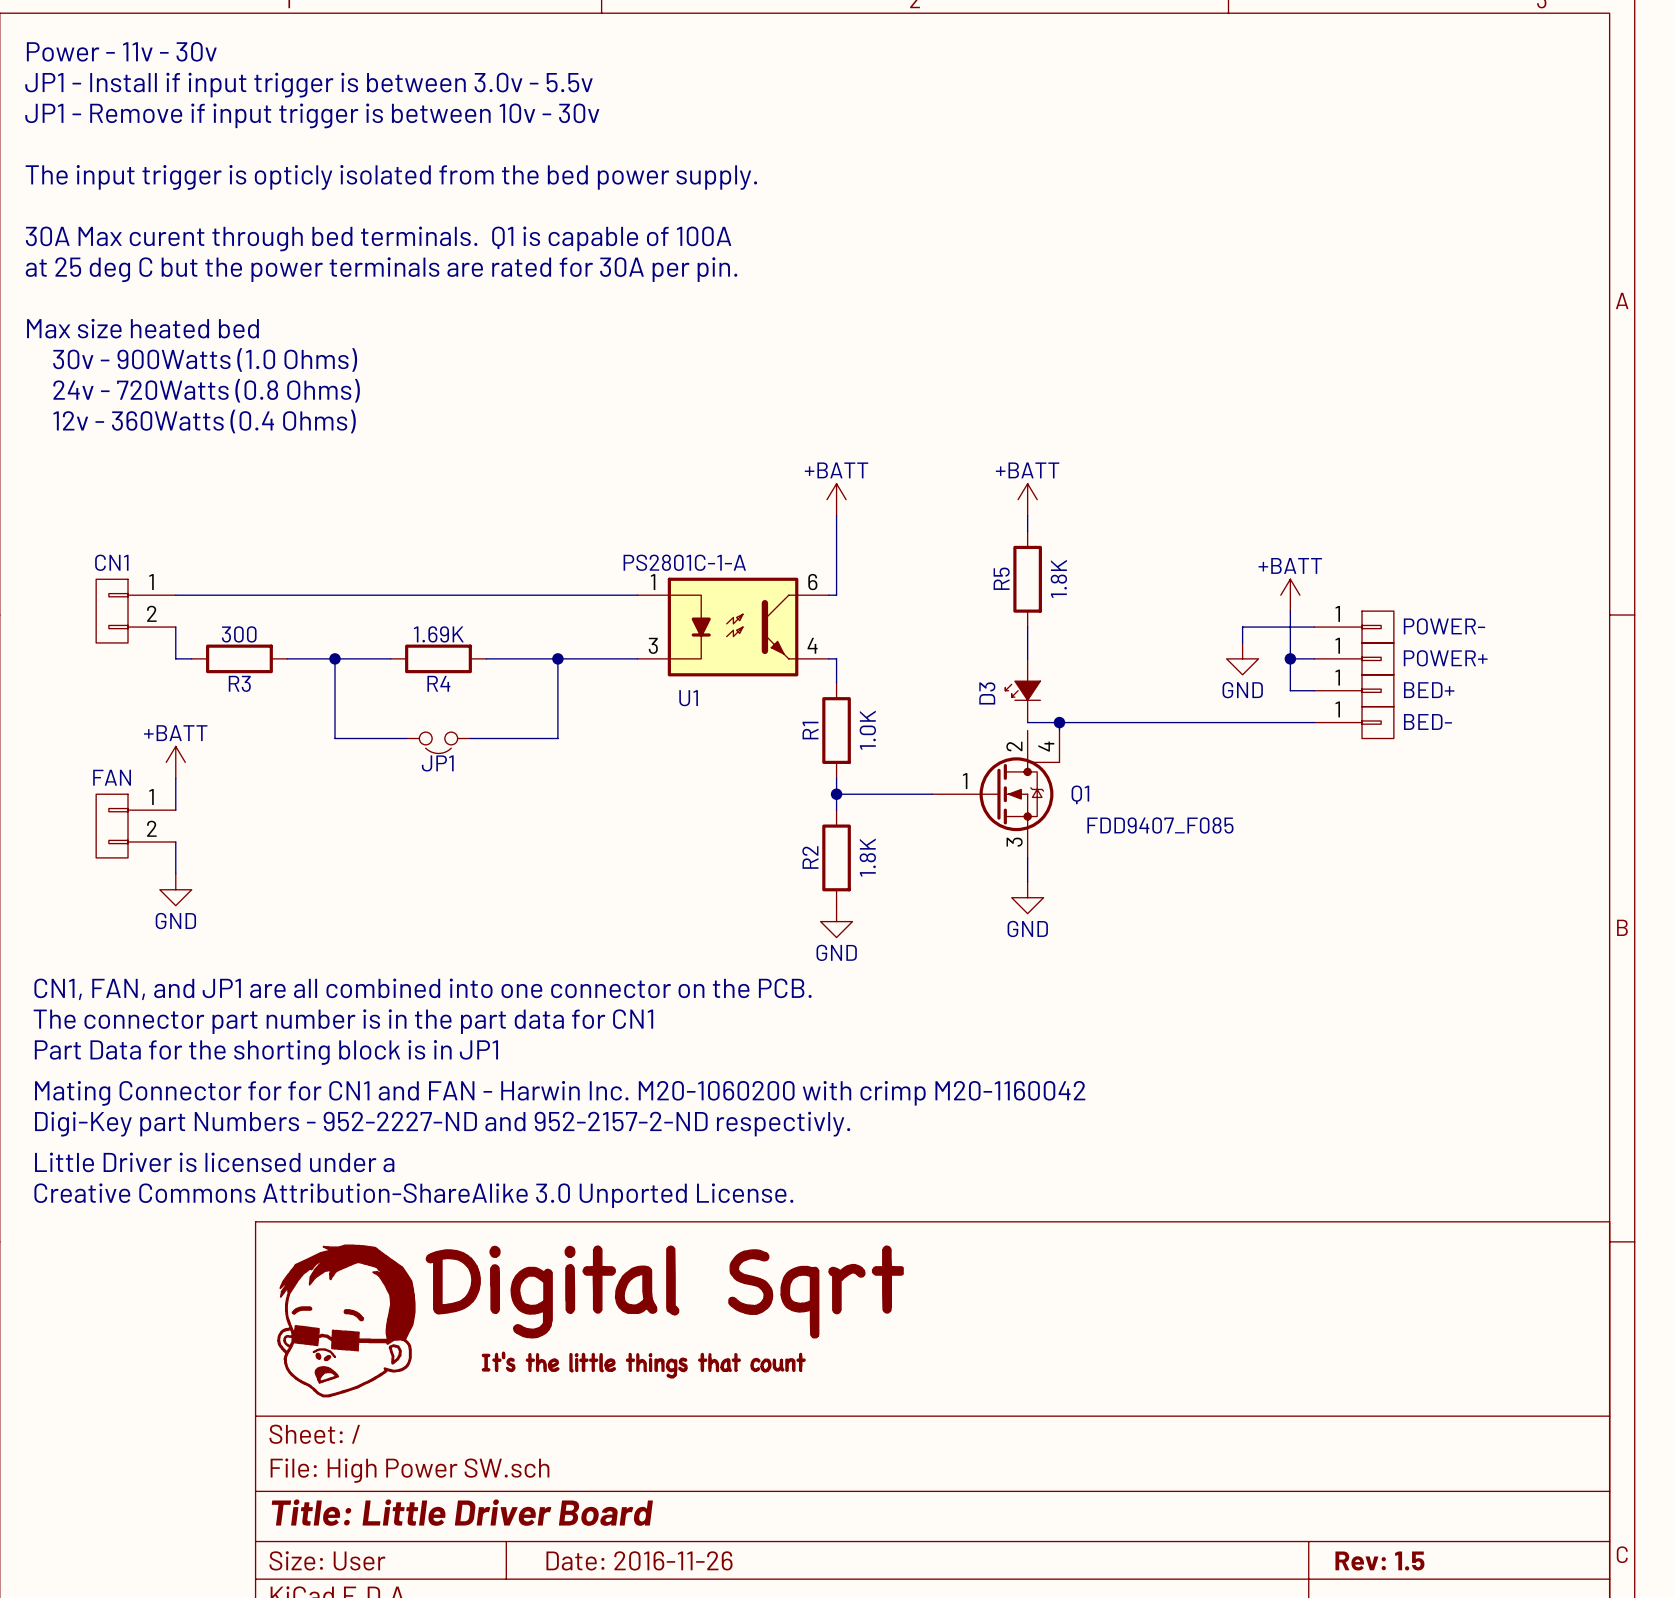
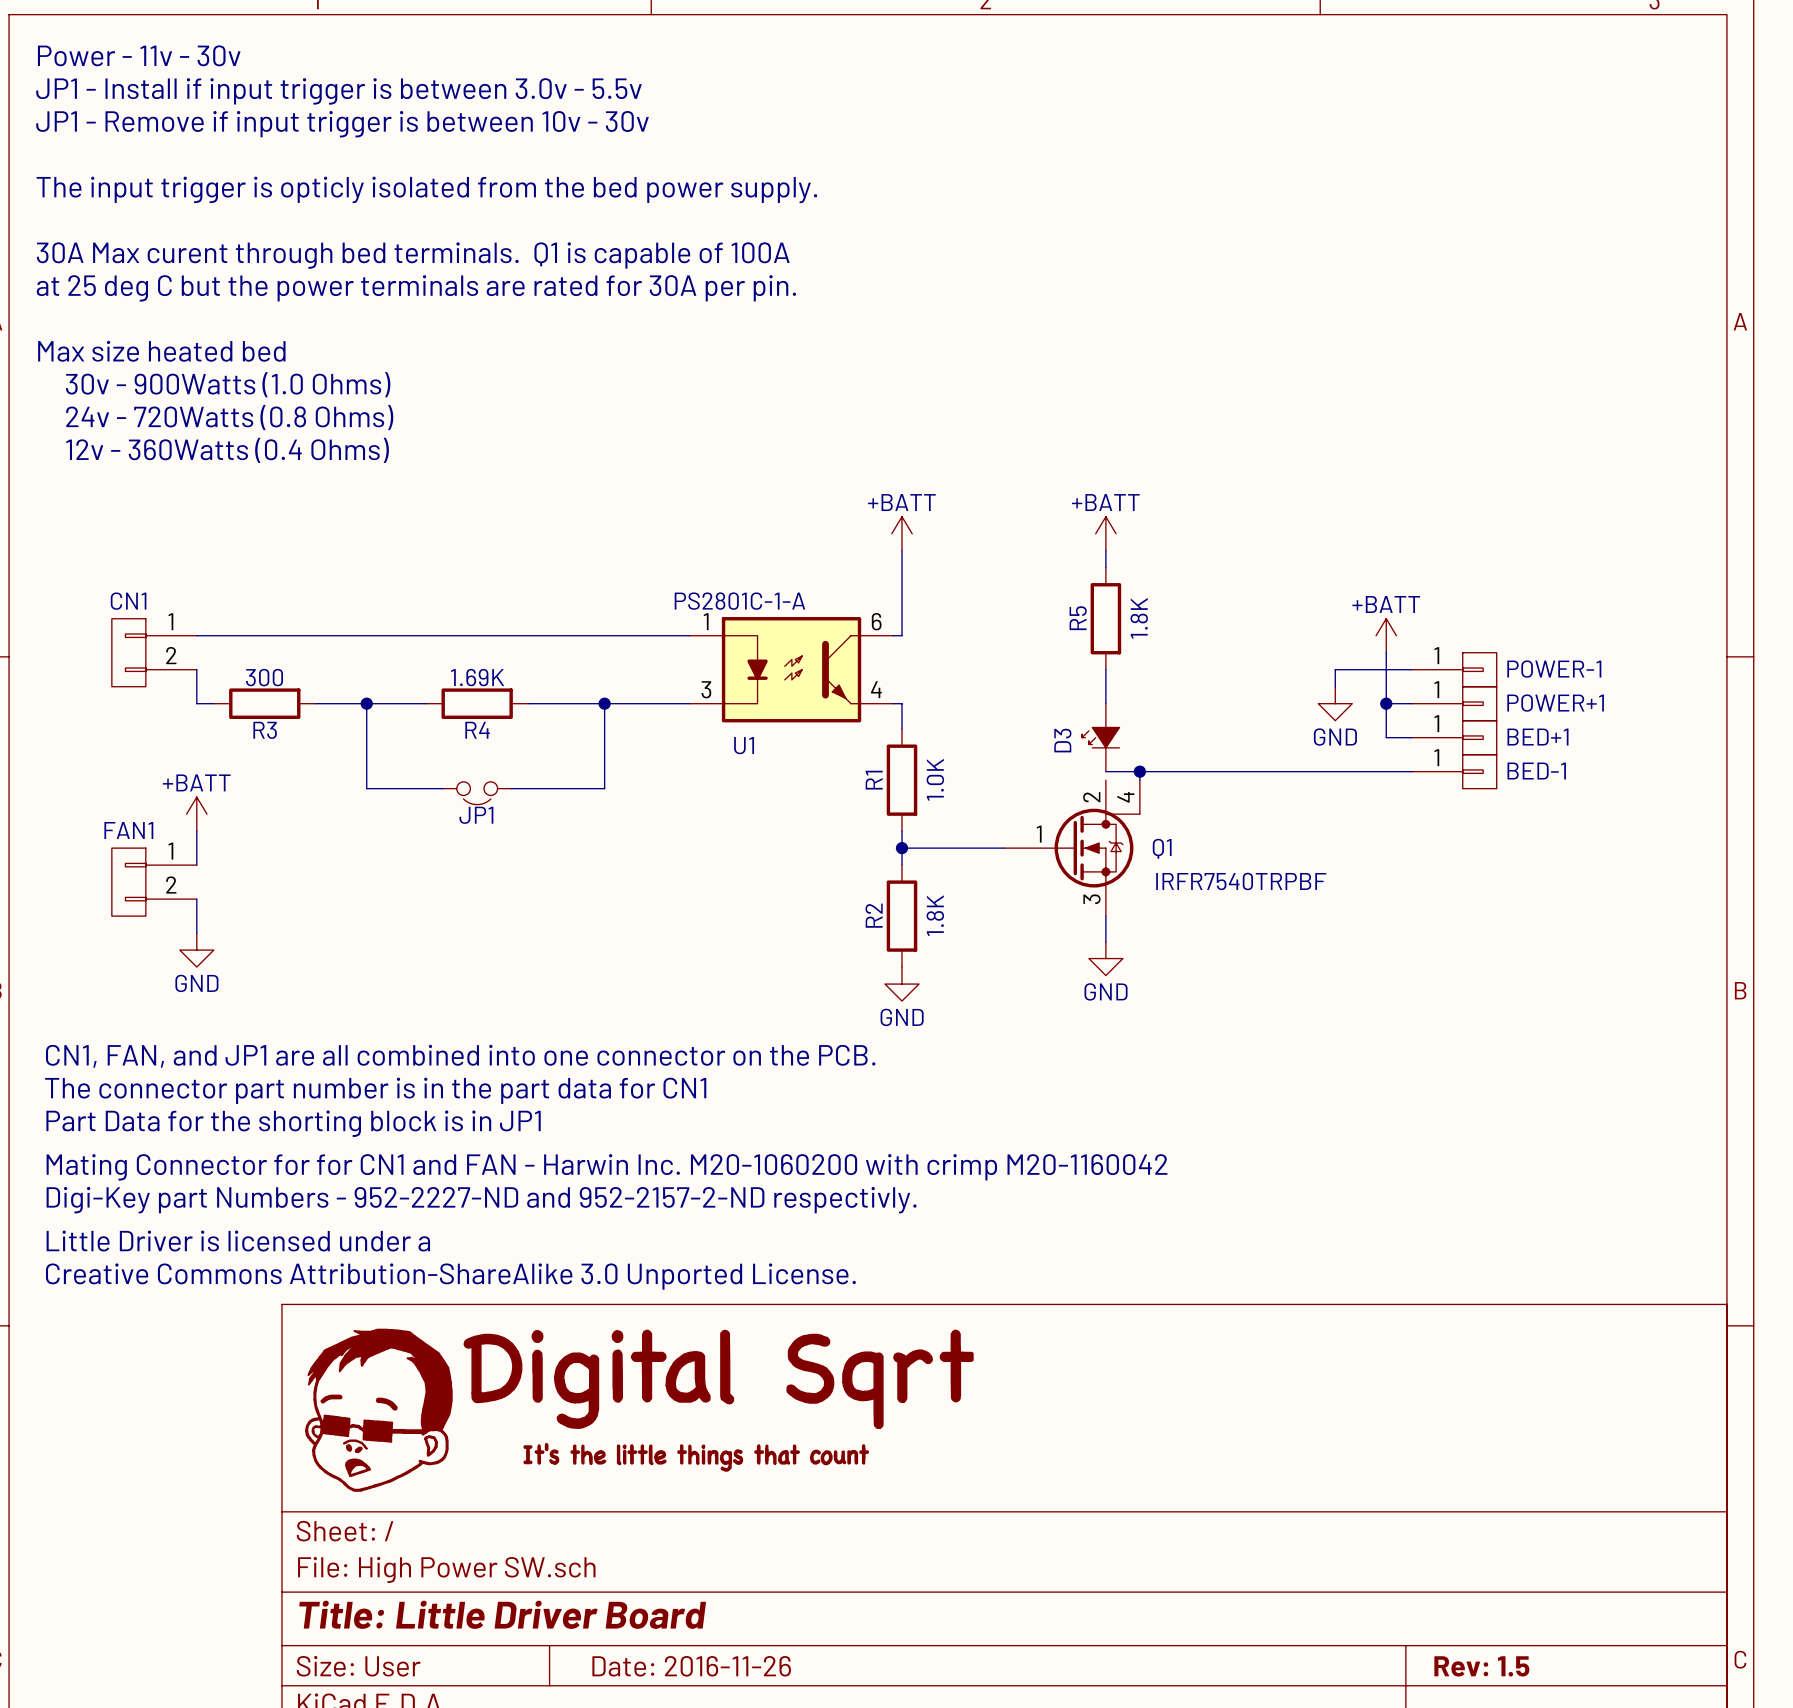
POWER- name: POWER- (1444, 626) -> POWER-1 (1554, 669)
POWER+ name: POWER+ (1445, 658) -> POWER+1 (1555, 703)
BED+ name: BED+ (1429, 690) -> BED+1 (1537, 737)
BED- name: BED- (1427, 721) -> BED-1 (1536, 771)
FAN name: FAN (112, 777) -> FAN1 (128, 830)
Q1 value: FDD9407_F085 (1160, 825) -> IRFR7540TRPBF (1241, 881)

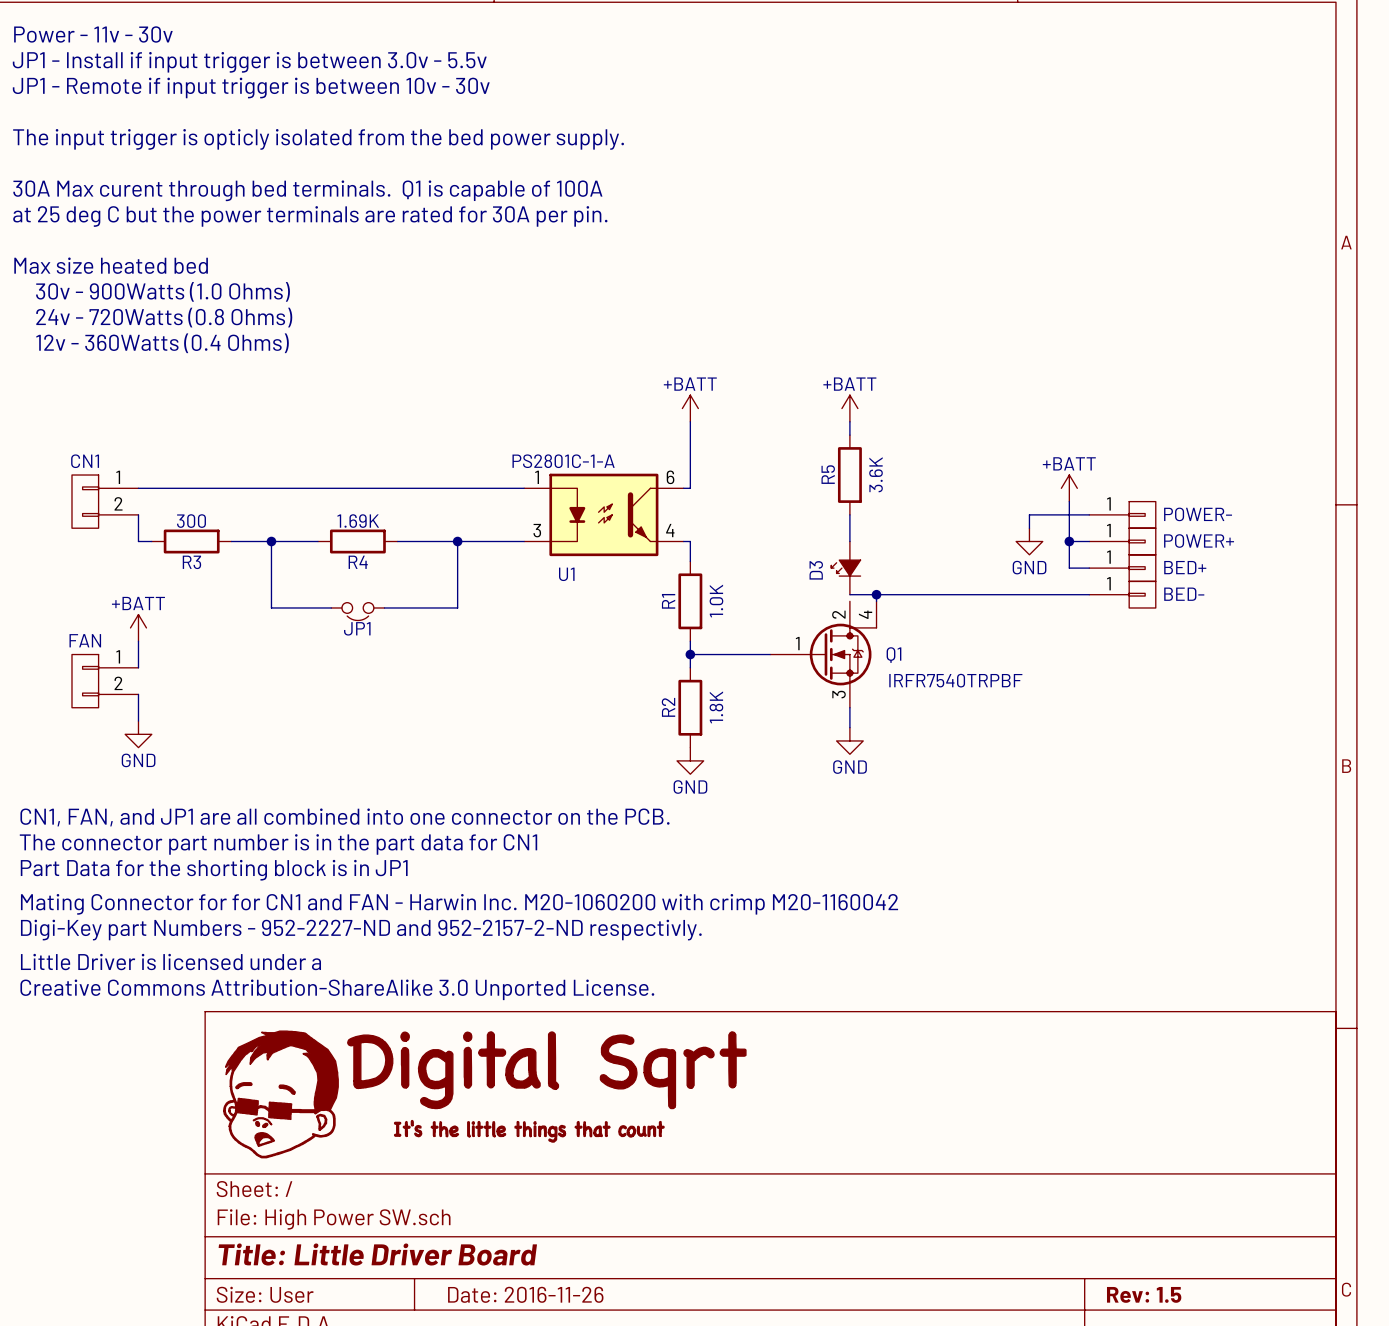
text: JP1 - Remove if input trigger is between 10v - 30v (342, 124) -> JP1 - Remote if input trigger is between 10v - 30v (251, 88)
R5 value: 1.8K (1139, 618) -> 3.6K (876, 474)
POWER-1 name: POWER-1 (1554, 669) -> POWER- (1198, 514)
POWER+1 name: POWER+1 (1555, 703) -> POWER+ (1199, 541)
BED+1 name: BED+1 (1537, 737) -> BED+ (1185, 567)
BED-1 name: BED-1 (1536, 771) -> BED- (1184, 594)
FAN1 name: FAN1 (128, 830) -> FAN (85, 640)

